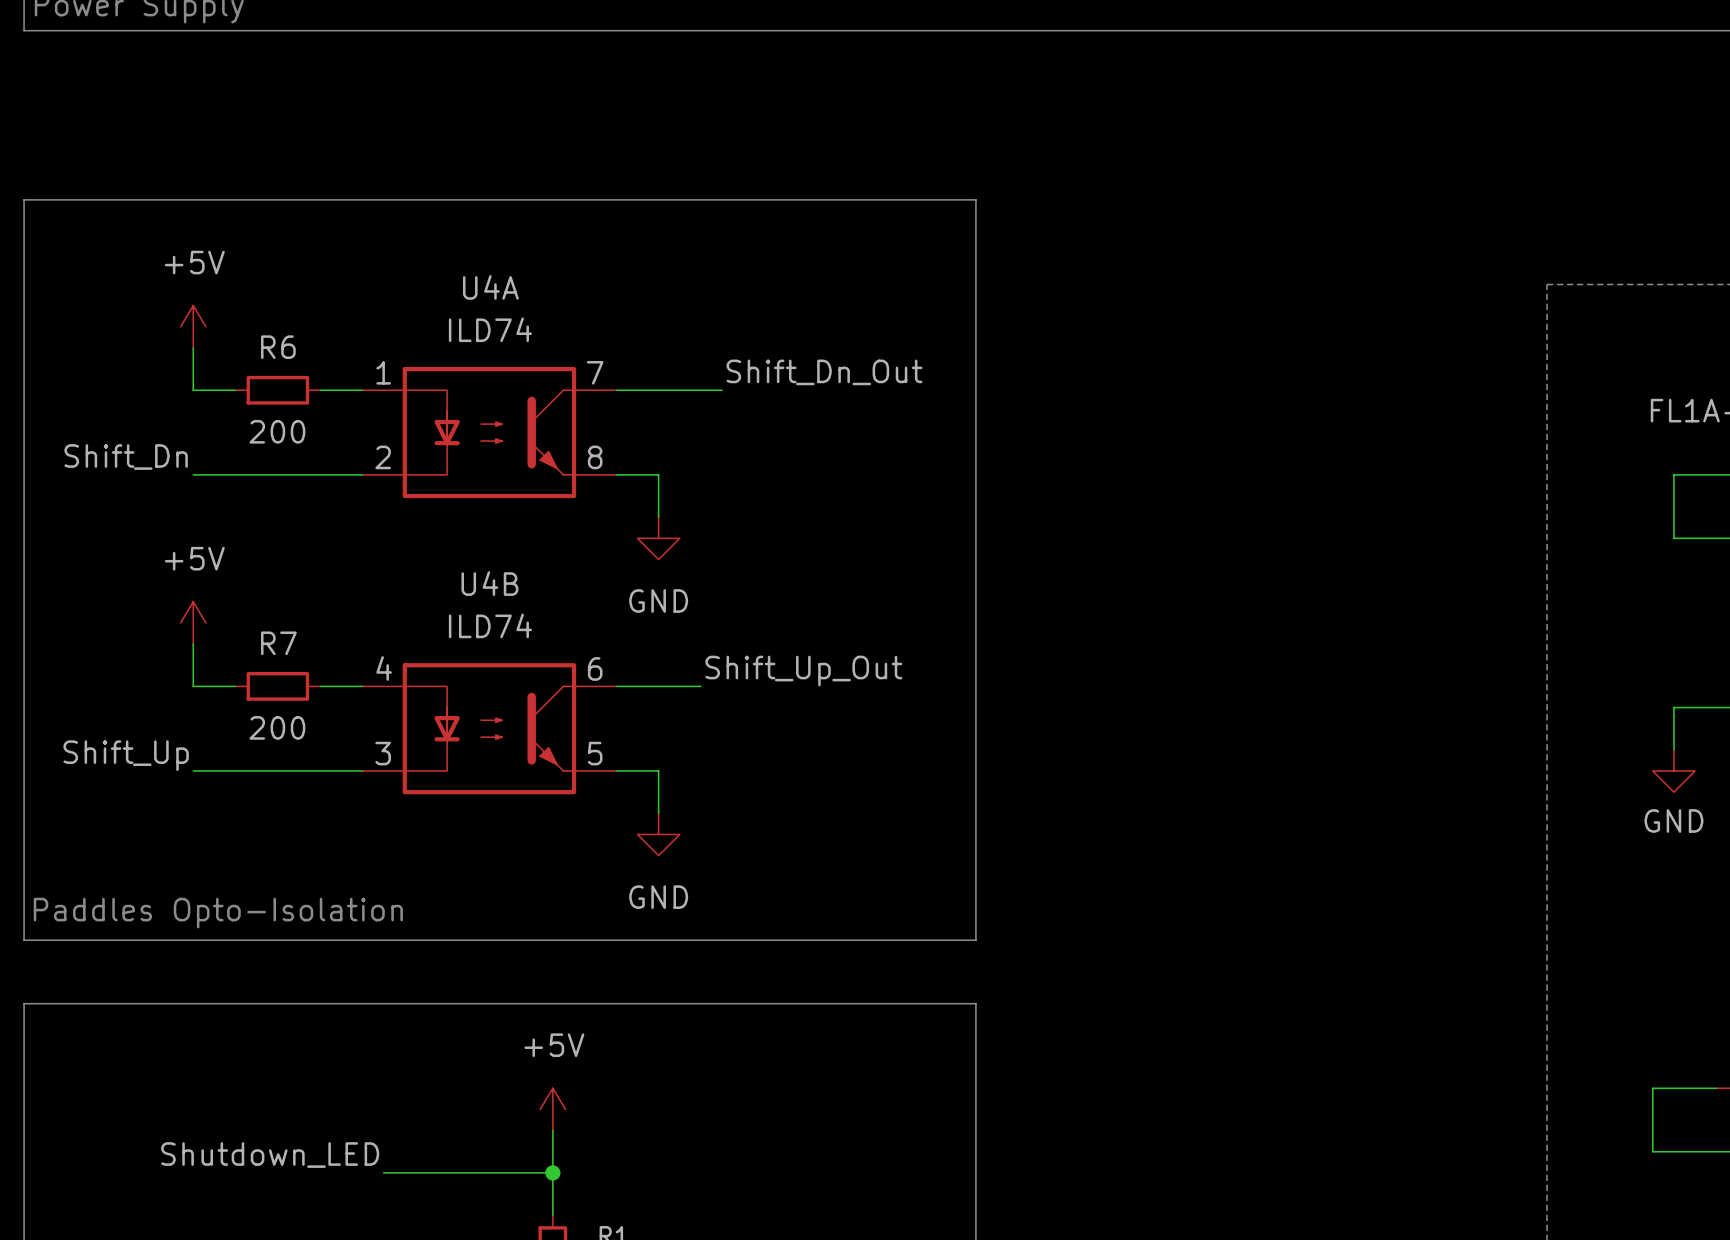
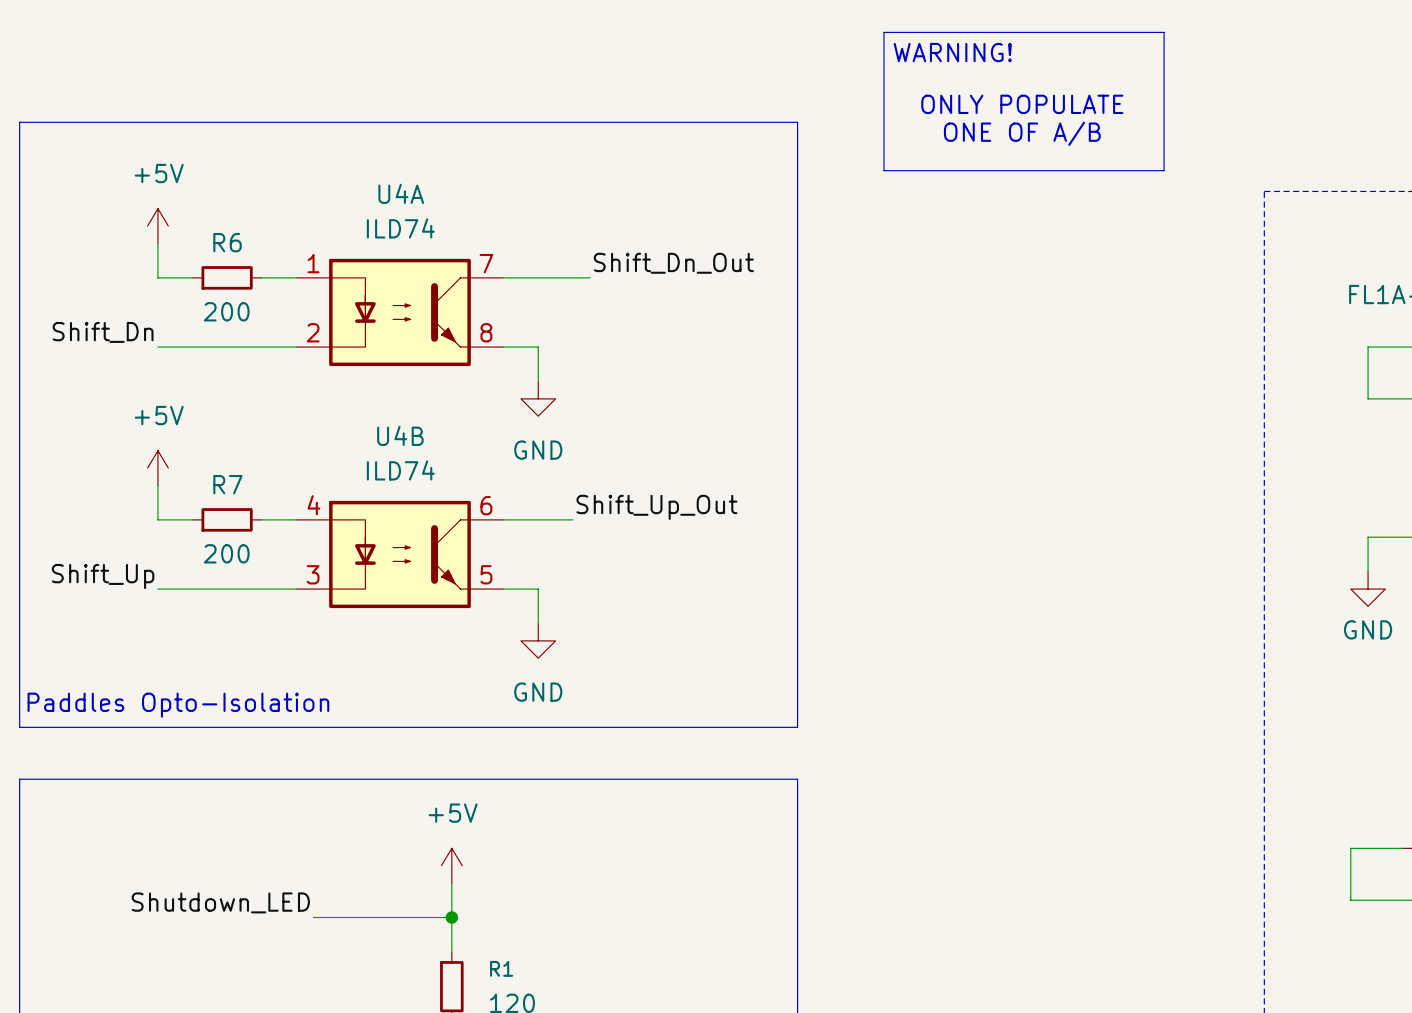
line: none -> (884, 32) (1164, 32) (1164, 170) (884, 170) (884, 32)
text: none -> WARNING! (952, 52)
text: none -> ONLY POPULATE (1022, 104)
text: none -> ONE OF A/B (1022, 133)

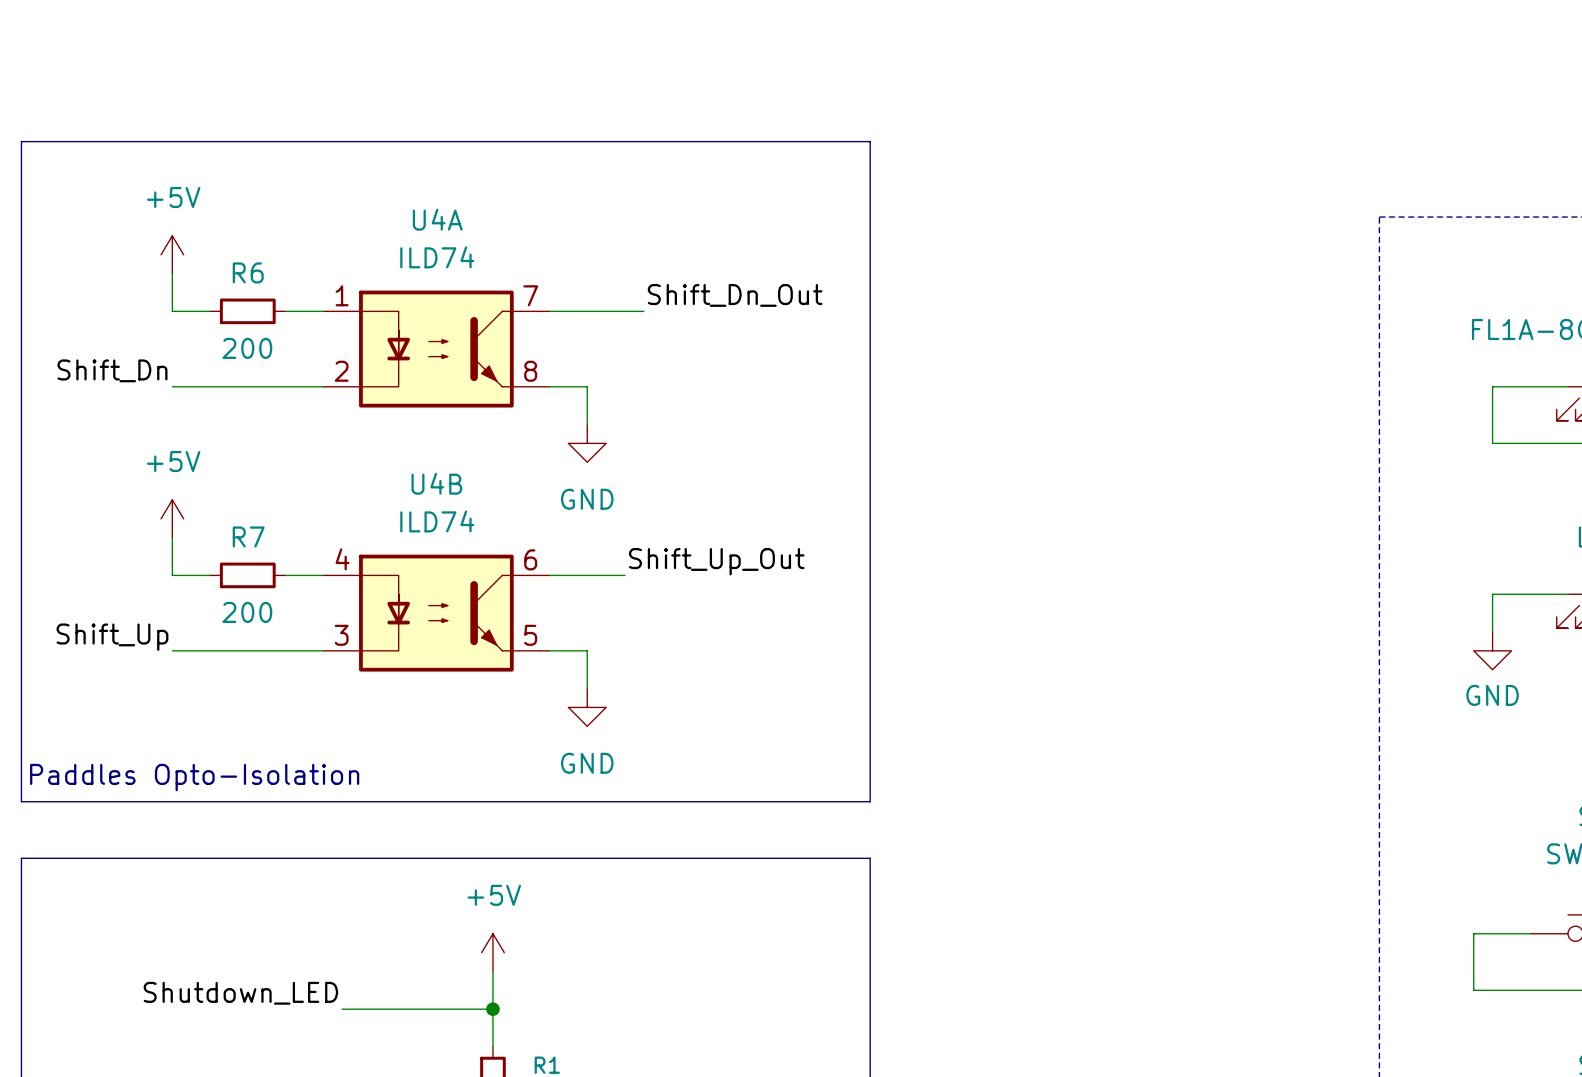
line: (884, 32) (1164, 32) (1164, 170) (884, 170) (884, 32) -> none
text: WARNING! (952, 52) -> none
text: ONLY POPULATE (1022, 104) -> none
text: ONE OF A/B (1022, 133) -> none

